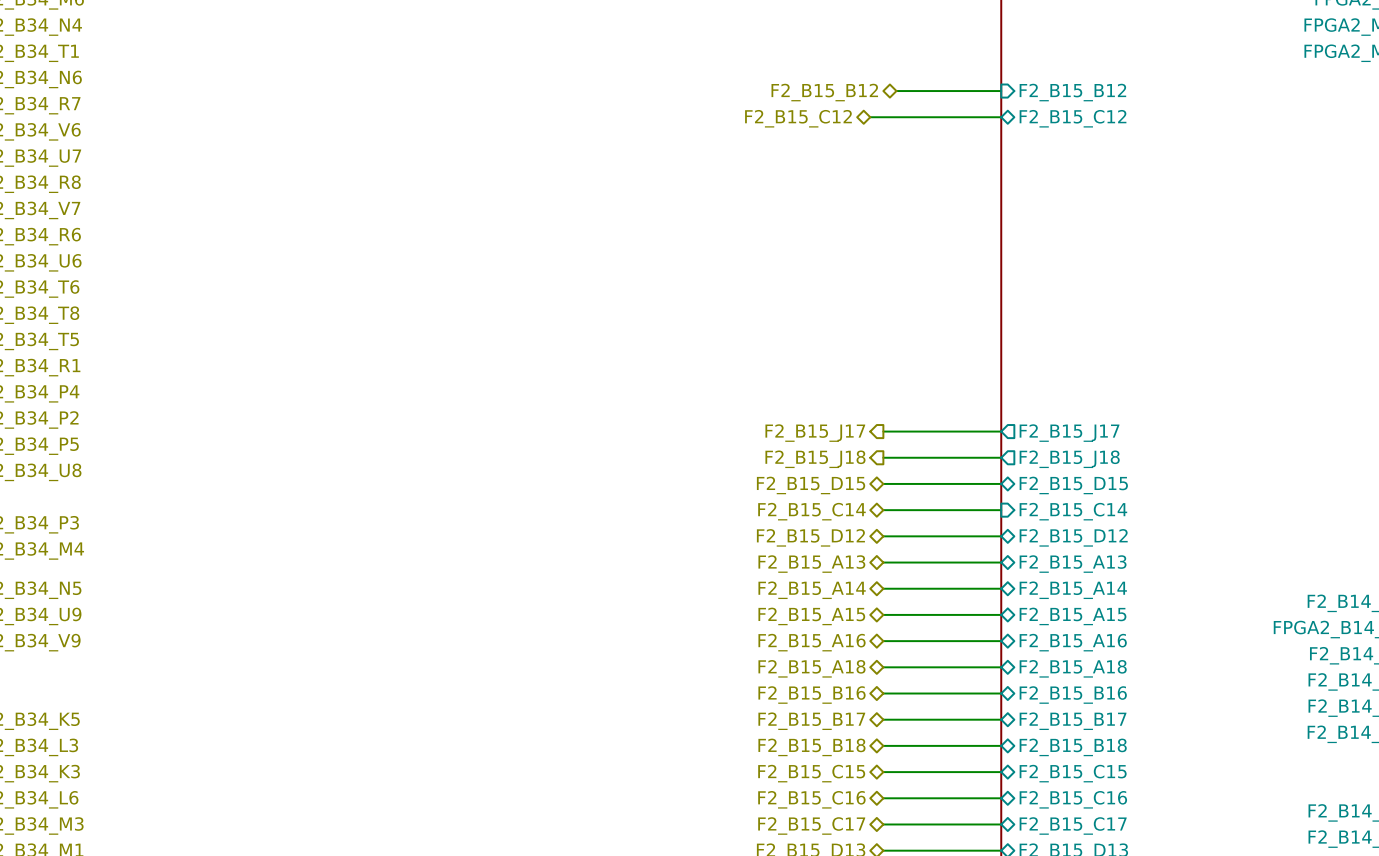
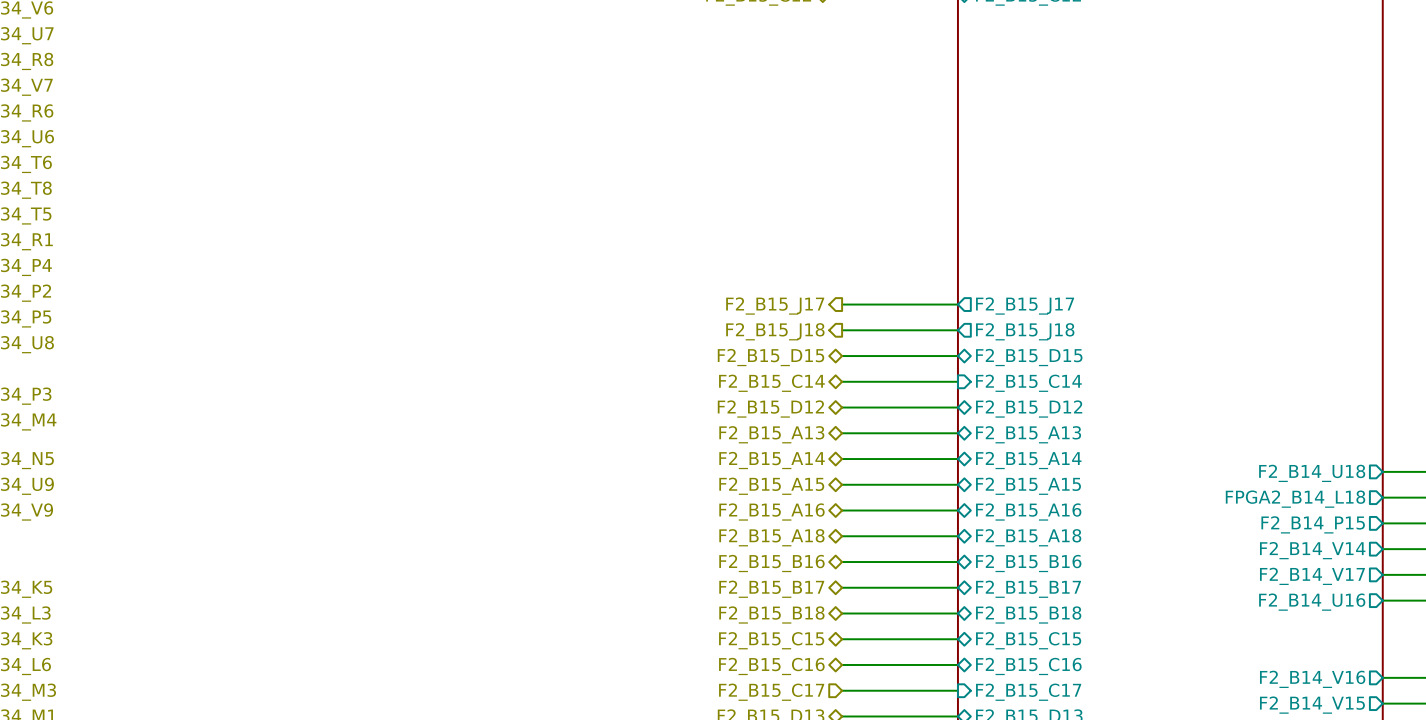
hierarchical label shape: bidirectional (811, 825) -> input (771, 692)
sheet pin shape: bidirectional (1073, 825) -> input (1028, 692)

